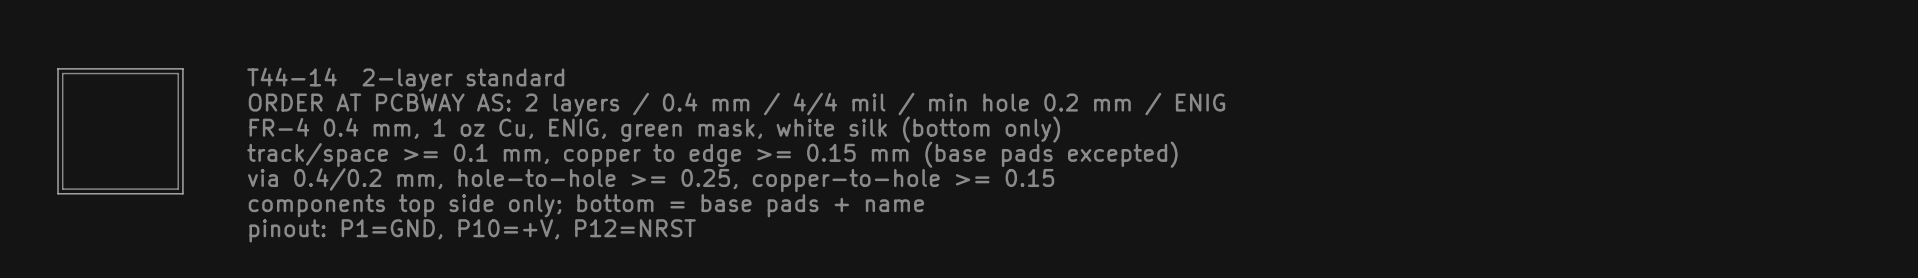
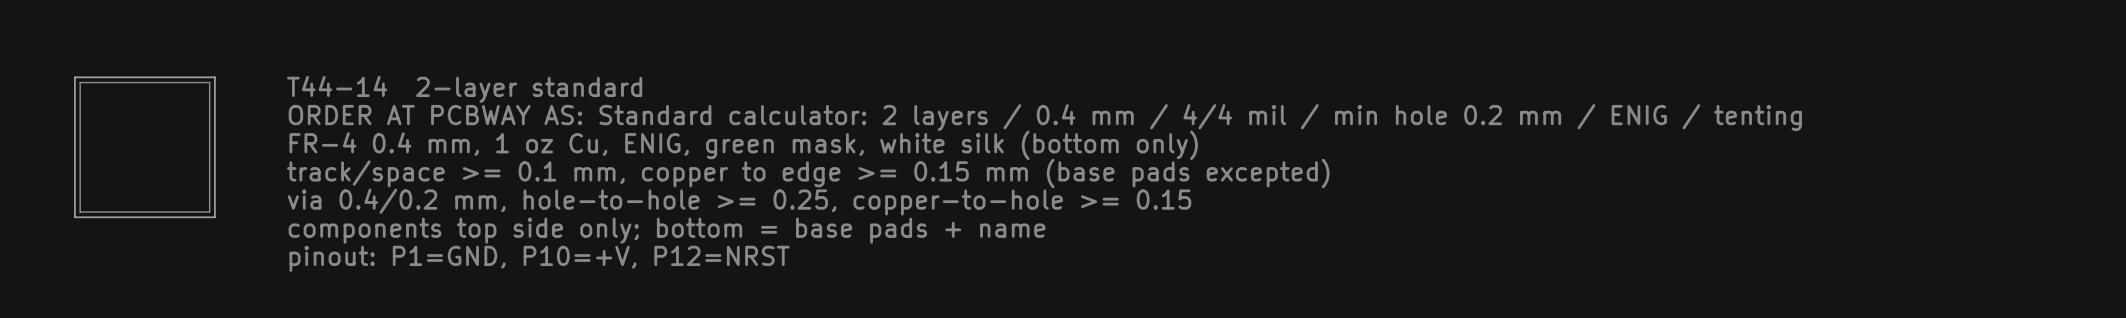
text: ORDER AT PCBWAY AS: 2 layers / 0.4 mm / 4/4 mil / min hole 0.2 mm / ENIG (736, 104) -> ORDER AT PCBWAY AS: Standard calculator: 2 layers / 0.4 mm / 4/4 mil / min hole 0.2 mm / ENIG / tenting (1045, 117)

